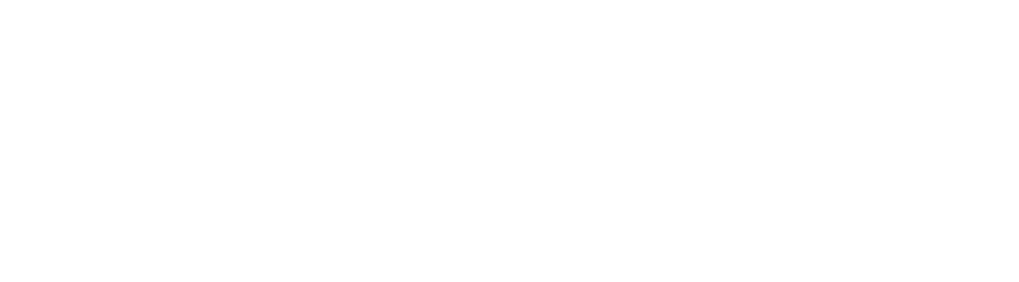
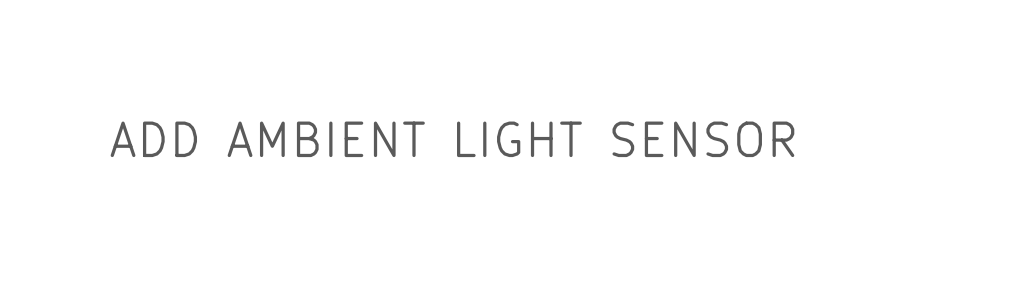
text: none -> ADD AMBIENT LIGHT SENSOR (452, 139)

